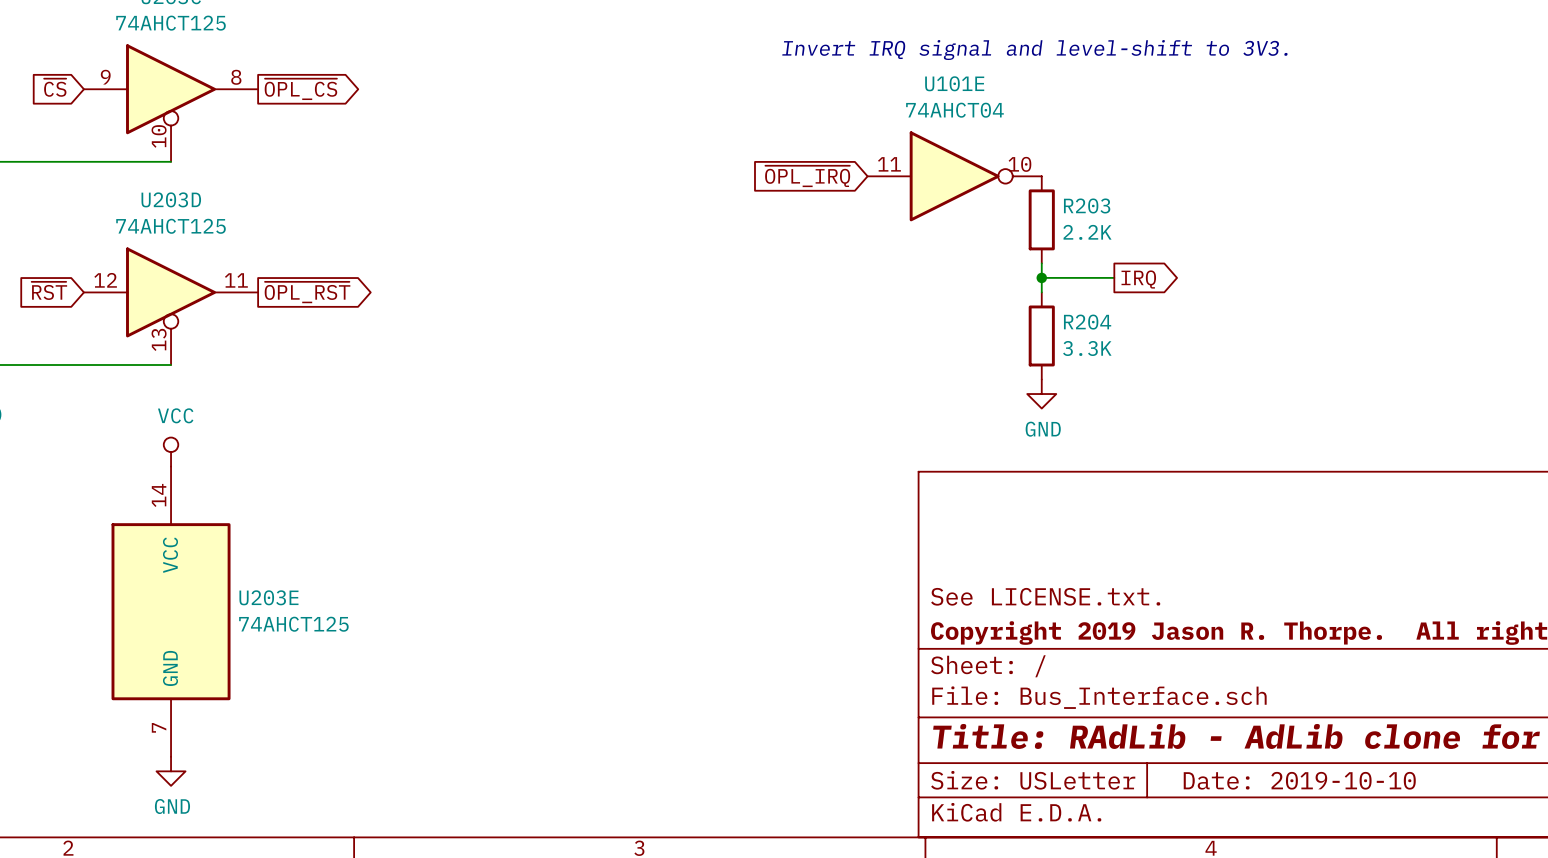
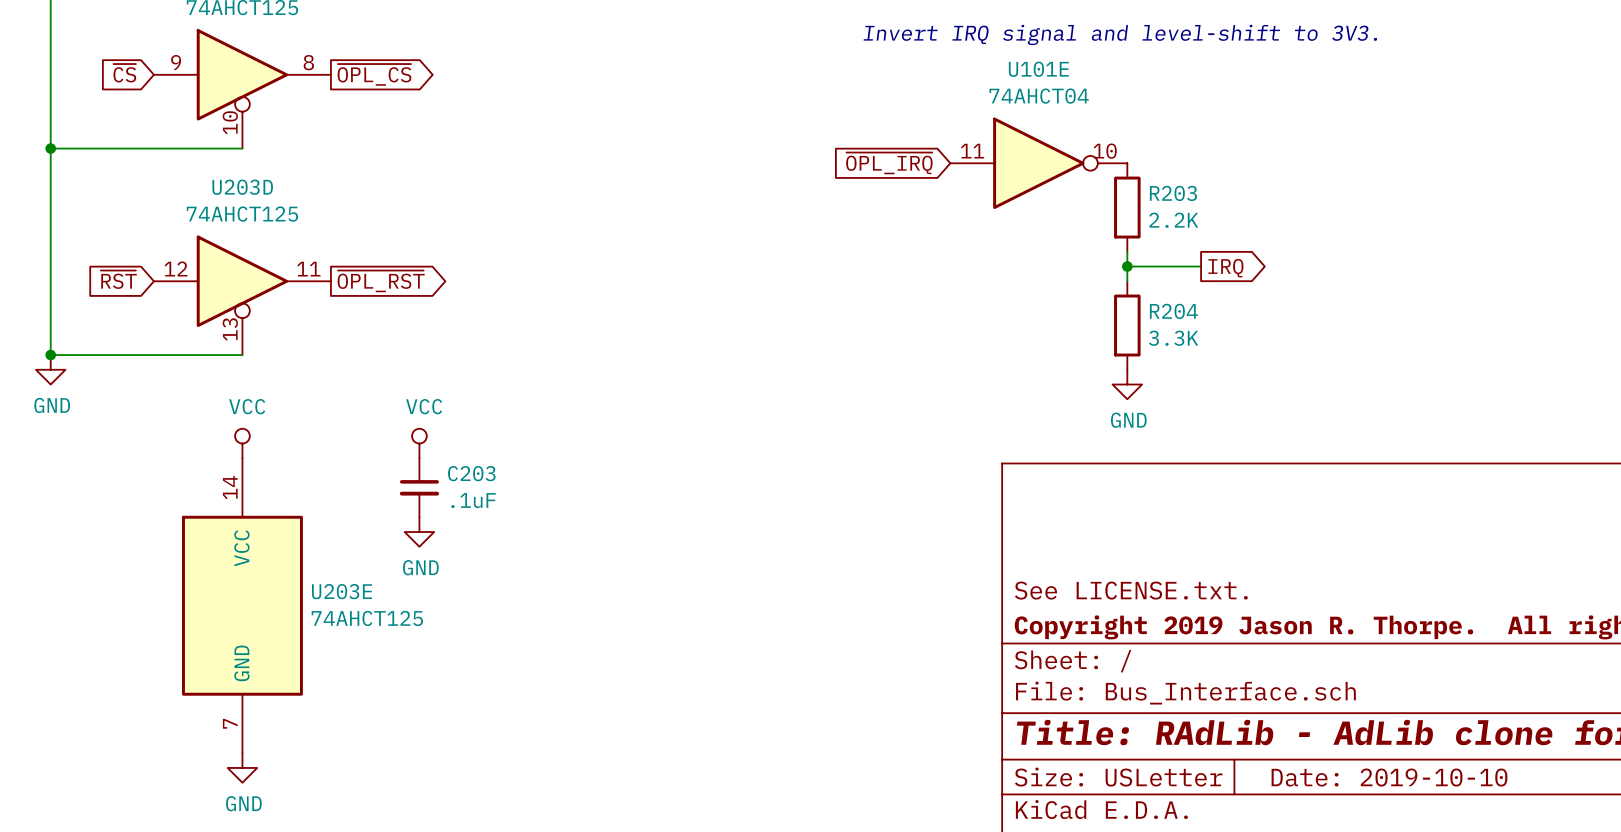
power symbol: none -> VCC (419, 443)
C203: none -> .1uF (419, 487)
power symbol: none -> GND (419, 532)

